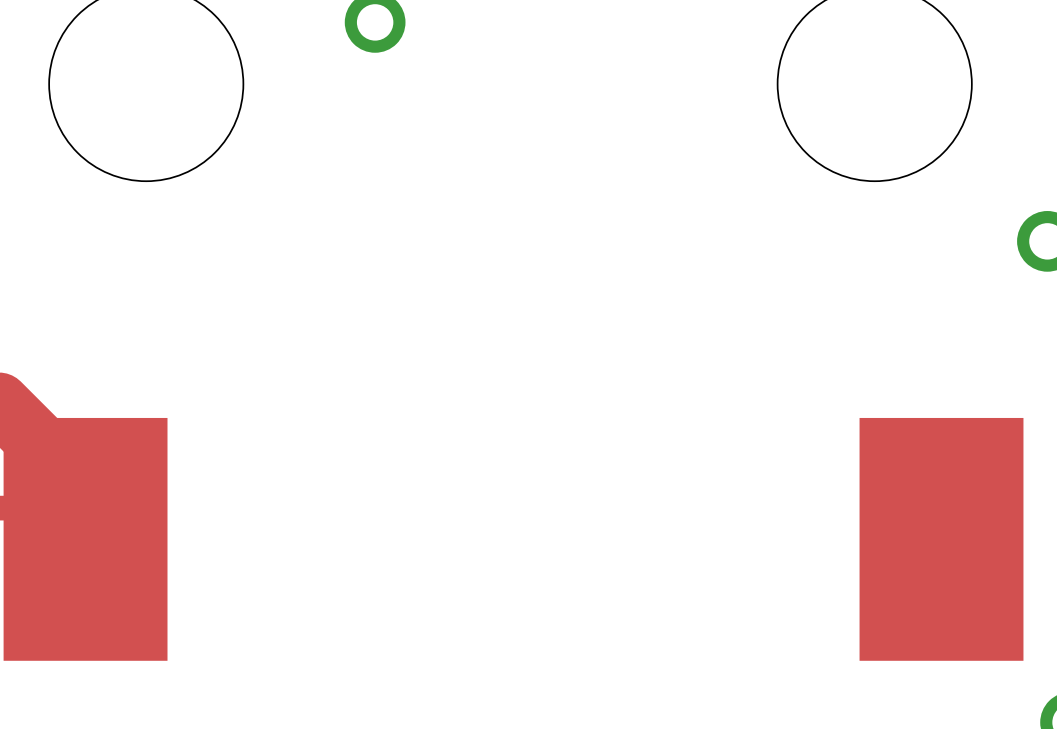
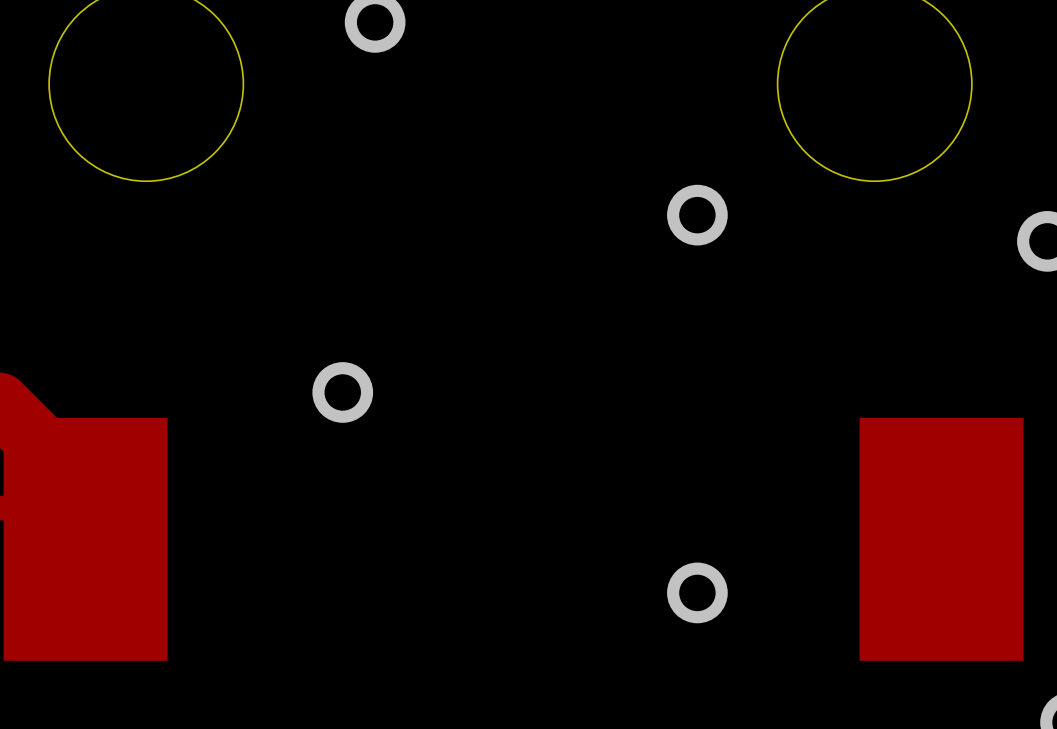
via: none -> (697, 215)
via: none -> (342, 392)
via: none -> (697, 592)

